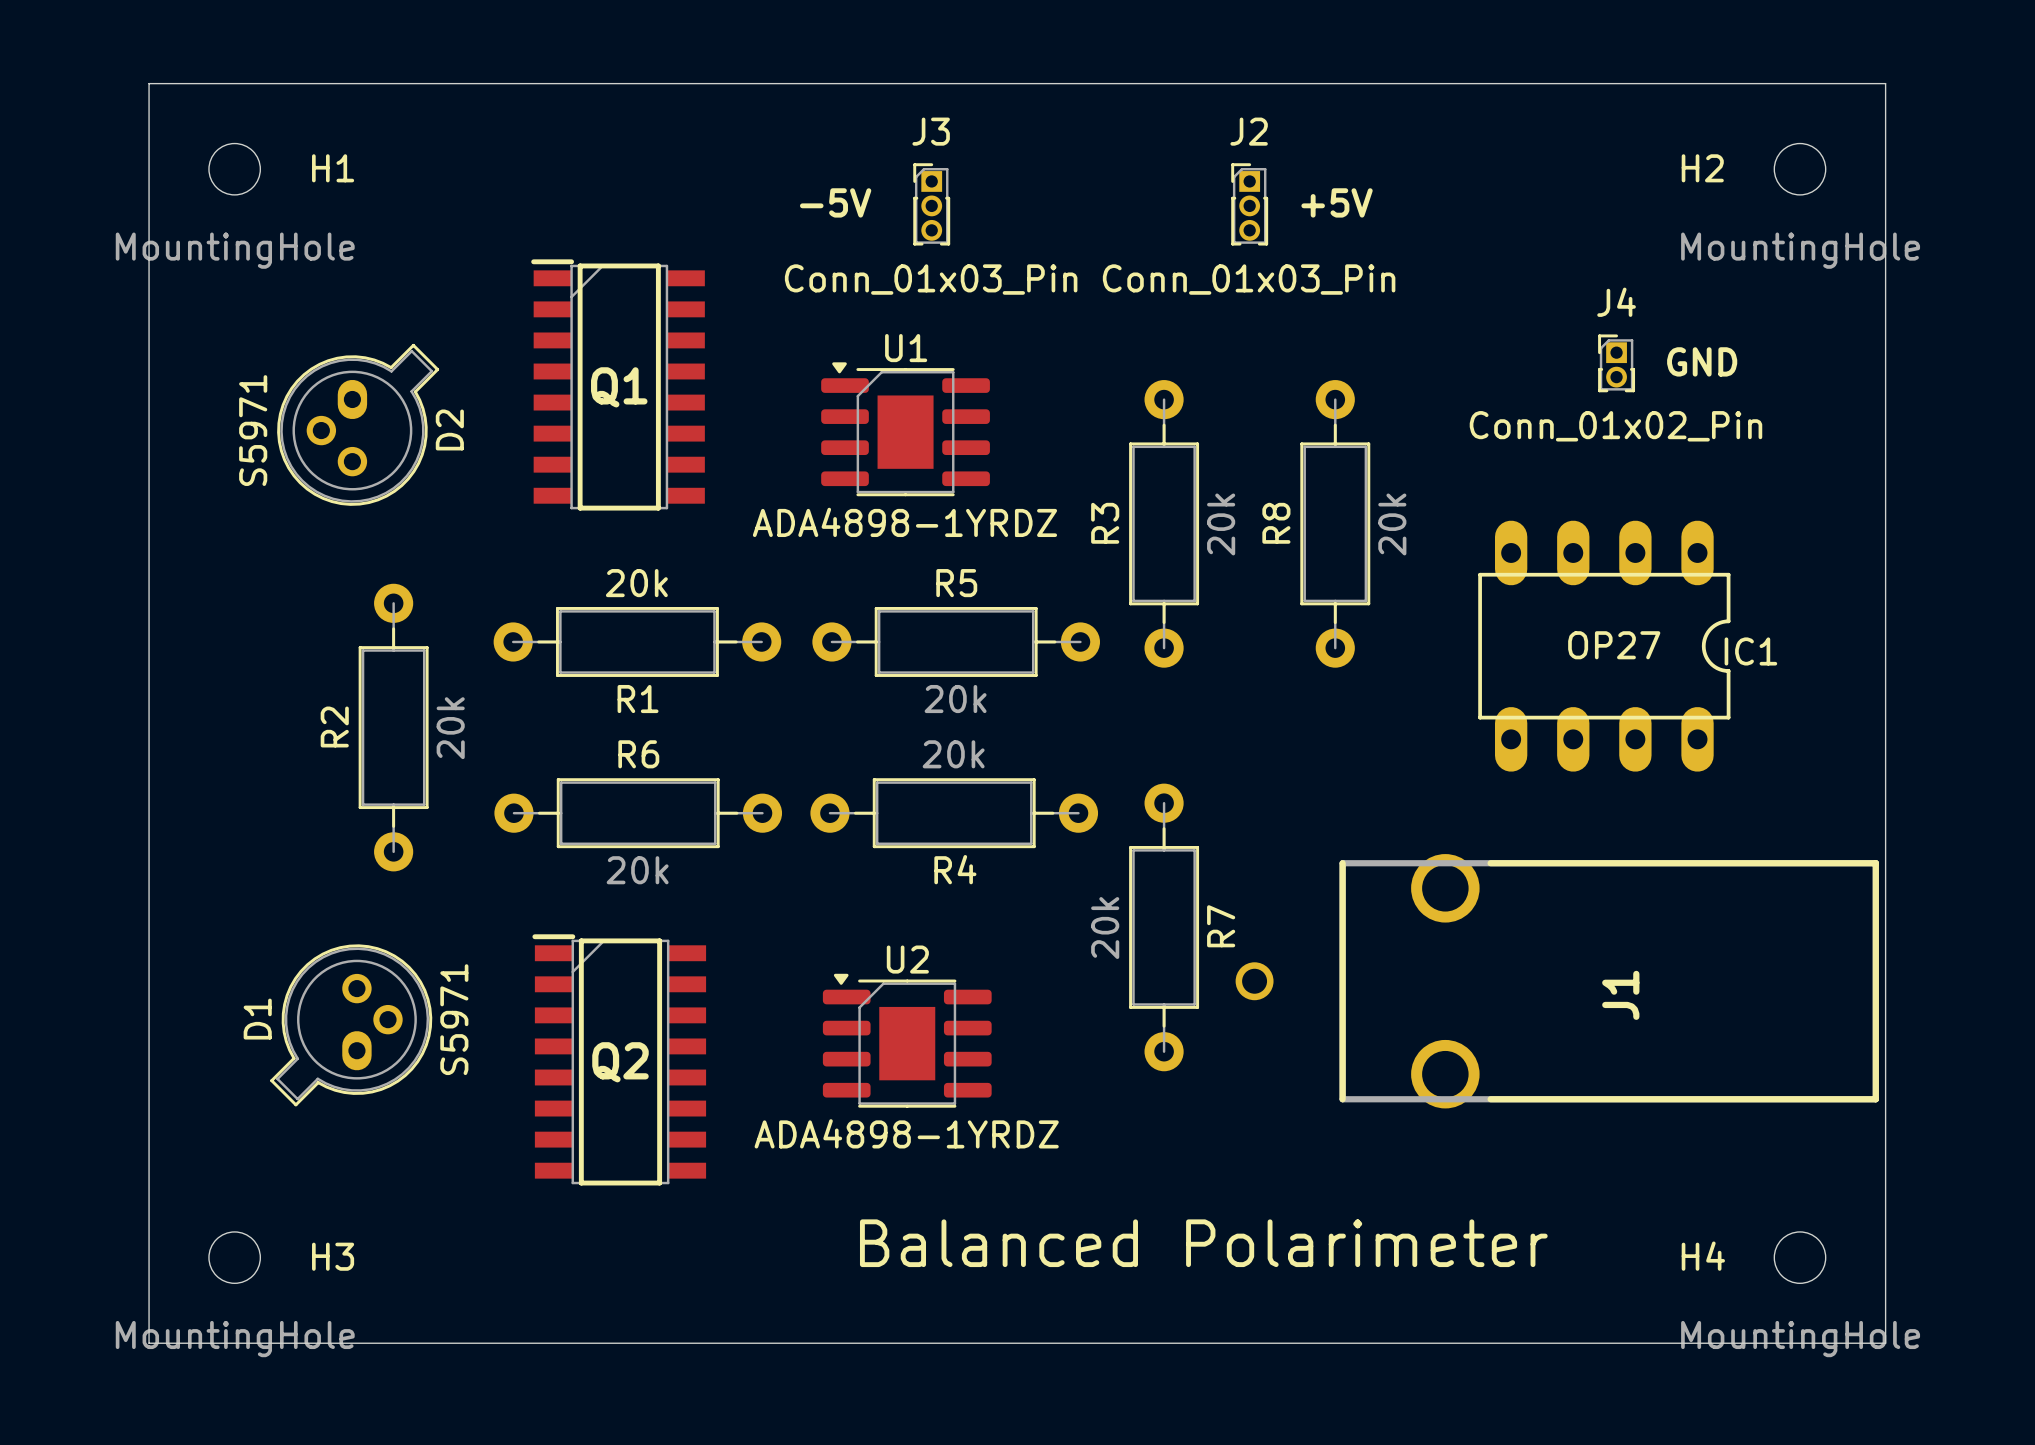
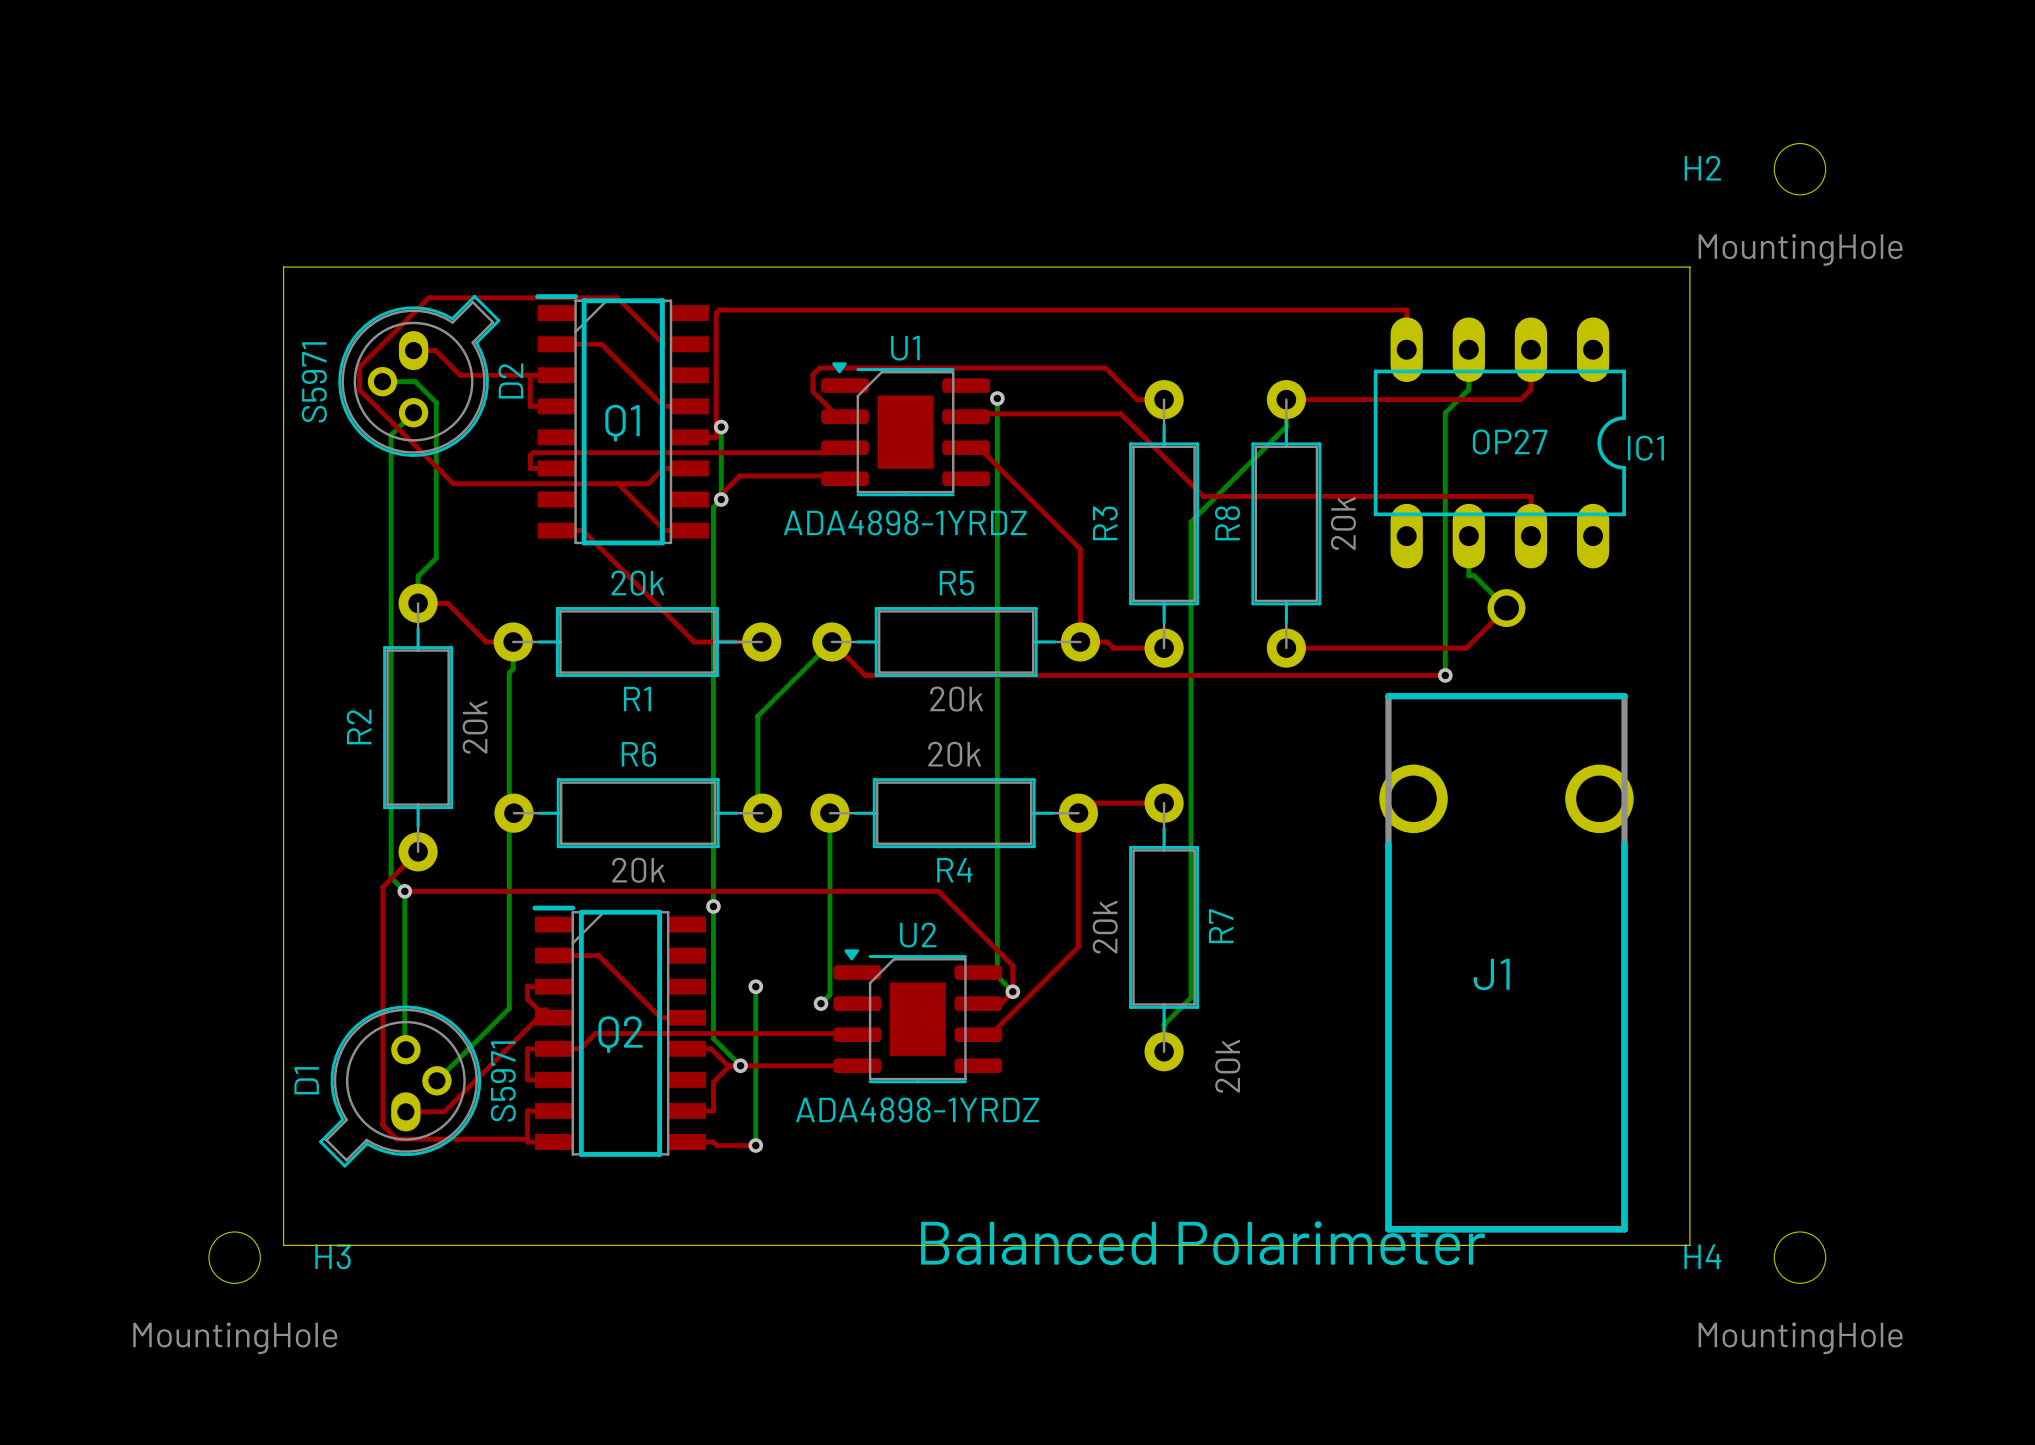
board edge: (149, 83) (1885, 83) (1885, 1343) (149, 1343) (149, 83) -> (283, 267) (283, 1245) (1689, 1245) (1689, 267) (283, 267)
H1: MountingHole (234, 169) -> none
text: -5V (835, 202) -> none
text: +5V (1337, 202) -> none
J3: Conn_01x03_Pin (931, 204) -> none
J2: Conn_01x03_Pin (1249, 204) -> none
top track: none -> (556, 344) (601, 344) (663, 406) (689, 406)
top track: none -> (663, 344) (617, 297) (428, 297) (359, 367) (359, 390) (453, 483) (648, 483) (663, 468) (689, 468)
top track: none -> (1406, 349) (1406, 310) (719, 310) (716, 313) (716, 437) (689, 437)
bottom track: none -> (1468, 349) (1468, 389) (1445, 412) (1445, 675)
top track: none -> (1530, 349) (1530, 389) (1520, 399) (1286, 399)
top track: none -> (413, 350) (435, 350) (460, 375) (556, 375)
text: GND (1702, 361) -> none
J4: Conn_01x02_Pin (1616, 363) -> none
top track: none -> (530, 375) (530, 406) (556, 406)
bottom track: none -> (382, 381) (415, 381) (436, 402) (436, 558) (418, 576) (418, 603)
Q1 position: (618, 384) -> (622, 419)
bottom track: none -> (997, 398) (997, 976) (1012, 991)
via: none -> (997, 398)
top track: none -> (1164, 399) (1137, 399) (1105, 368) (819, 368) (813, 374) (813, 391) (835, 413) (845, 413)
bottom track: none -> (1286, 399) (1286, 426) (1191, 521) (1191, 997) (1164, 1024) (1164, 1051)
bottom track: none -> (413, 412) (391, 435) (391, 877) (404, 891) (405, 1049)
top track: none -> (966, 413) (1120, 413) (1203, 496) (1530, 496) (1530, 536)
D2 position: (358, 424) -> (419, 375)
bottom track: none -> (721, 427) (721, 499) (713, 507) (713, 1038) (740, 1065)
via: none -> (721, 427)
top track: none -> (845, 444) (837, 452) (533, 452) (530, 455) (530, 468) (556, 468)
top track: none -> (966, 444) (976, 444) (1080, 549) (1080, 641) (1107, 641) (1113, 648) (1164, 648)
top track: none -> (845, 475) (739, 475) (716, 499)
top track: none -> (618, 483) (663, 530) (689, 530)
via: none -> (721, 499)
R8 position: (1335, 523) -> (1286, 523)
R3 value position: 20k (1221, 524) -> 20k (1227, 1066)
top track: none -> (556, 530) (582, 530) (694, 641) (761, 641)
bottom track: none -> (1468, 536) (1468, 575) (1474, 575) (1506, 608)
top track: none -> (418, 603) (447, 603) (486, 641) (513, 641)
top track: none -> (1506, 608) (1466, 648) (1286, 648)
bottom track: none -> (513, 641) (513, 668) (509, 672) (509, 1008) (436, 1080)
top track: none -> (831, 641) (865, 675) (1445, 675)
bottom track: none -> (831, 641) (757, 716) (757, 813)
IC1 position: (1604, 646) -> (1499, 442)
via: none -> (1445, 675)
R2 position: (393, 727) -> (418, 727)
top track: none -> (1164, 803) (1088, 803) (1078, 813) (1078, 946) (990, 1034) (978, 1034)
bottom track: none -> (829, 813) (829, 994) (821, 1003)
top track: none -> (418, 851) (382, 887) (382, 1125) (396, 1139) (527, 1139)
top track: none -> (404, 891) (938, 891) (1012, 965) (1012, 991) (1000, 1003) (978, 1003)
via: none -> (404, 891)
via: none -> (713, 906)
top track: none -> (553, 955) (598, 955) (660, 1017) (687, 1017)
J1 rotation: 0° (1557, 981) -> 90° clockwise (1506, 910)
top track: none -> (553, 986) (527, 986) (527, 999) (538, 1010) (546, 1010)
bottom track: none -> (755, 986) (755, 1145)
via: none -> (755, 986)
via: none -> (1012, 991)
via: none -> (821, 1003)
top track: none -> (546, 1010) (444, 1111) (405, 1111)
D1 position: (351, 1025) -> (400, 1086)
top track: none -> (857, 1034) (595, 1033) (580, 1048) (527, 1048) (527, 1079) (553, 1079)
U2 position: (907, 1040) -> (917, 1016)
top track: none -> (687, 1048) (711, 1048) (728, 1066)
Q2 position: (619, 1059) -> (619, 1031)
via: none -> (740, 1065)
top track: none -> (857, 1065) (729, 1065) (713, 1082) (713, 1110) (687, 1110)
top track: none -> (553, 1110) (527, 1110) (527, 1142) (553, 1142)
top track: none -> (687, 1142) (713, 1142) (716, 1145) (755, 1145)
via: none -> (755, 1145)

